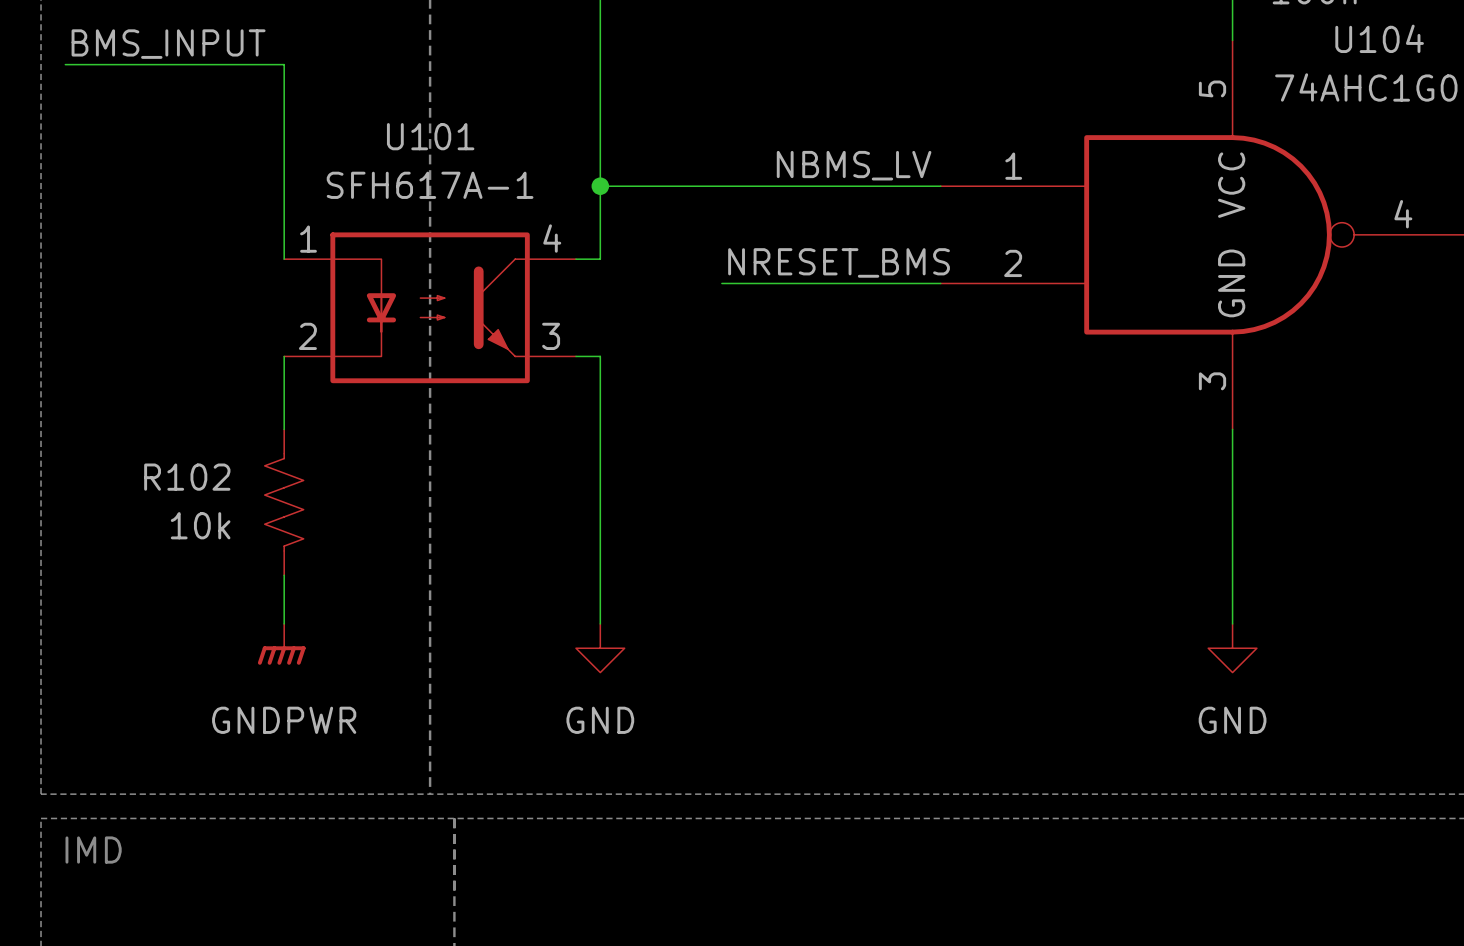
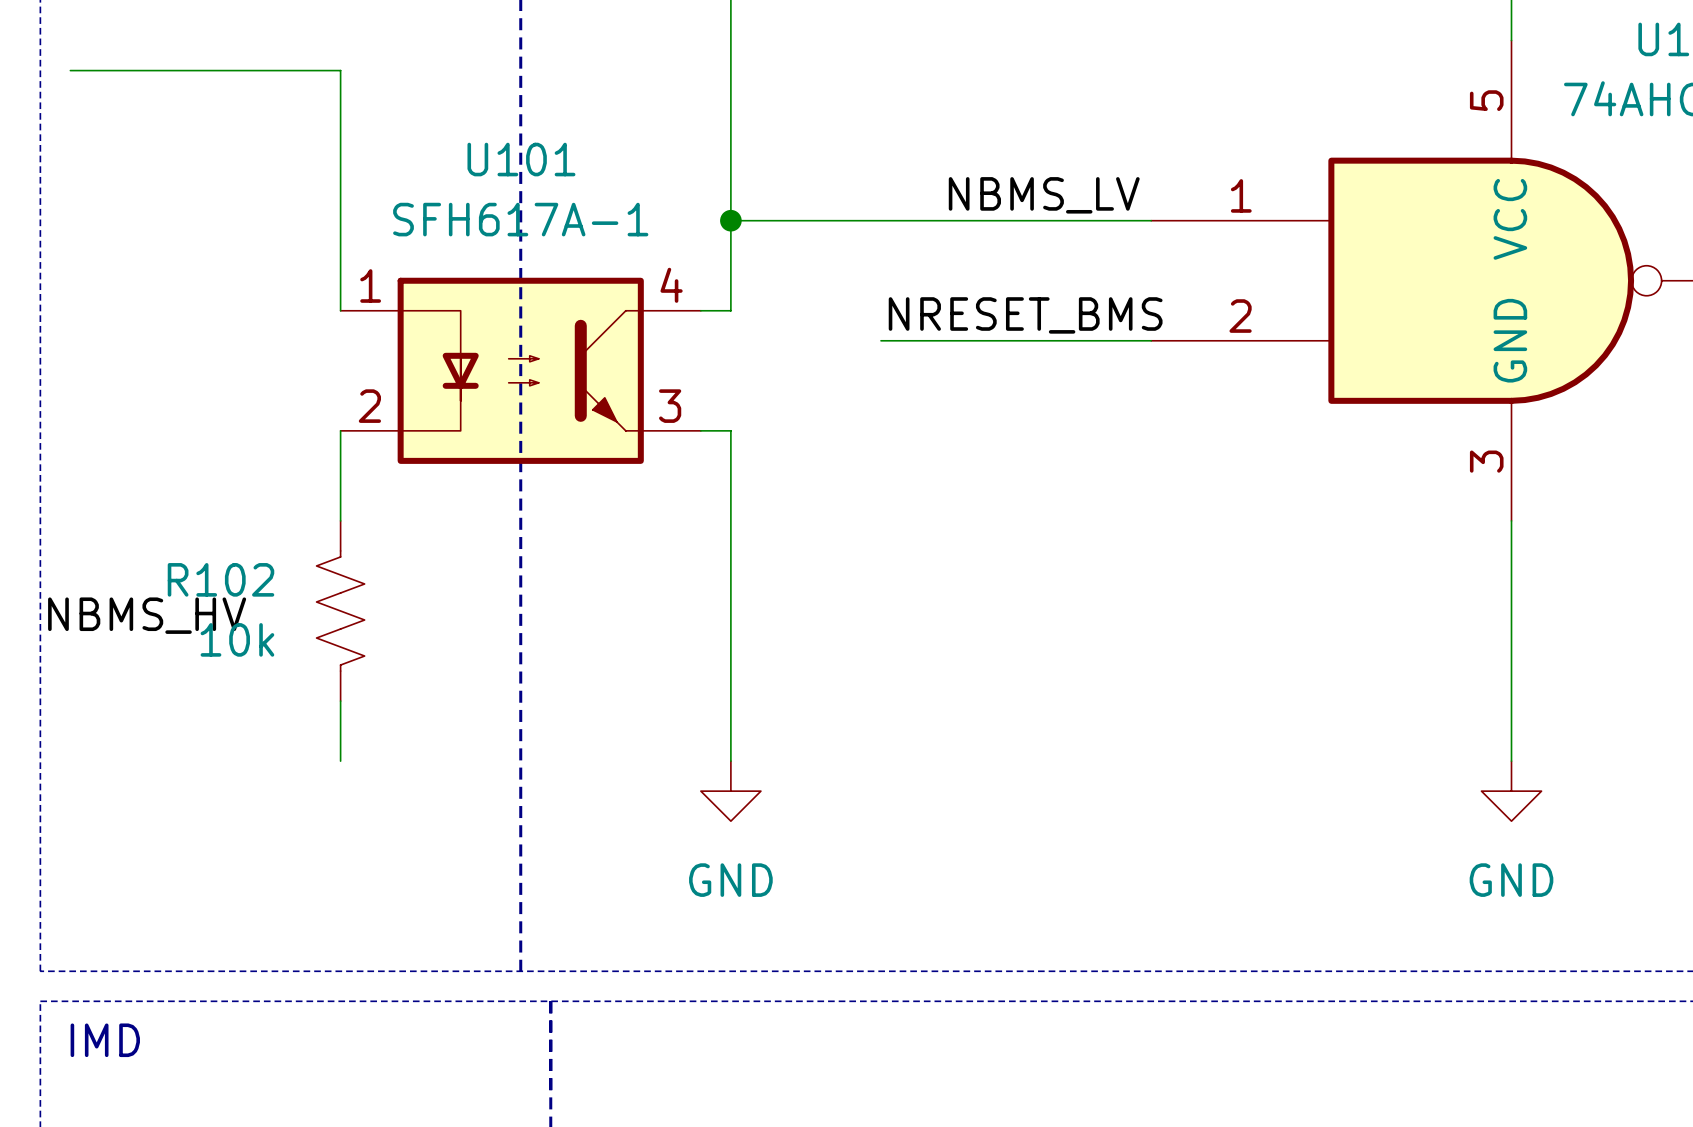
label: BMS_INPUT (168, 44) -> none
label: none -> NBMS_HV (147, 615)
power symbol: GNDPWR (281, 644) -> none

